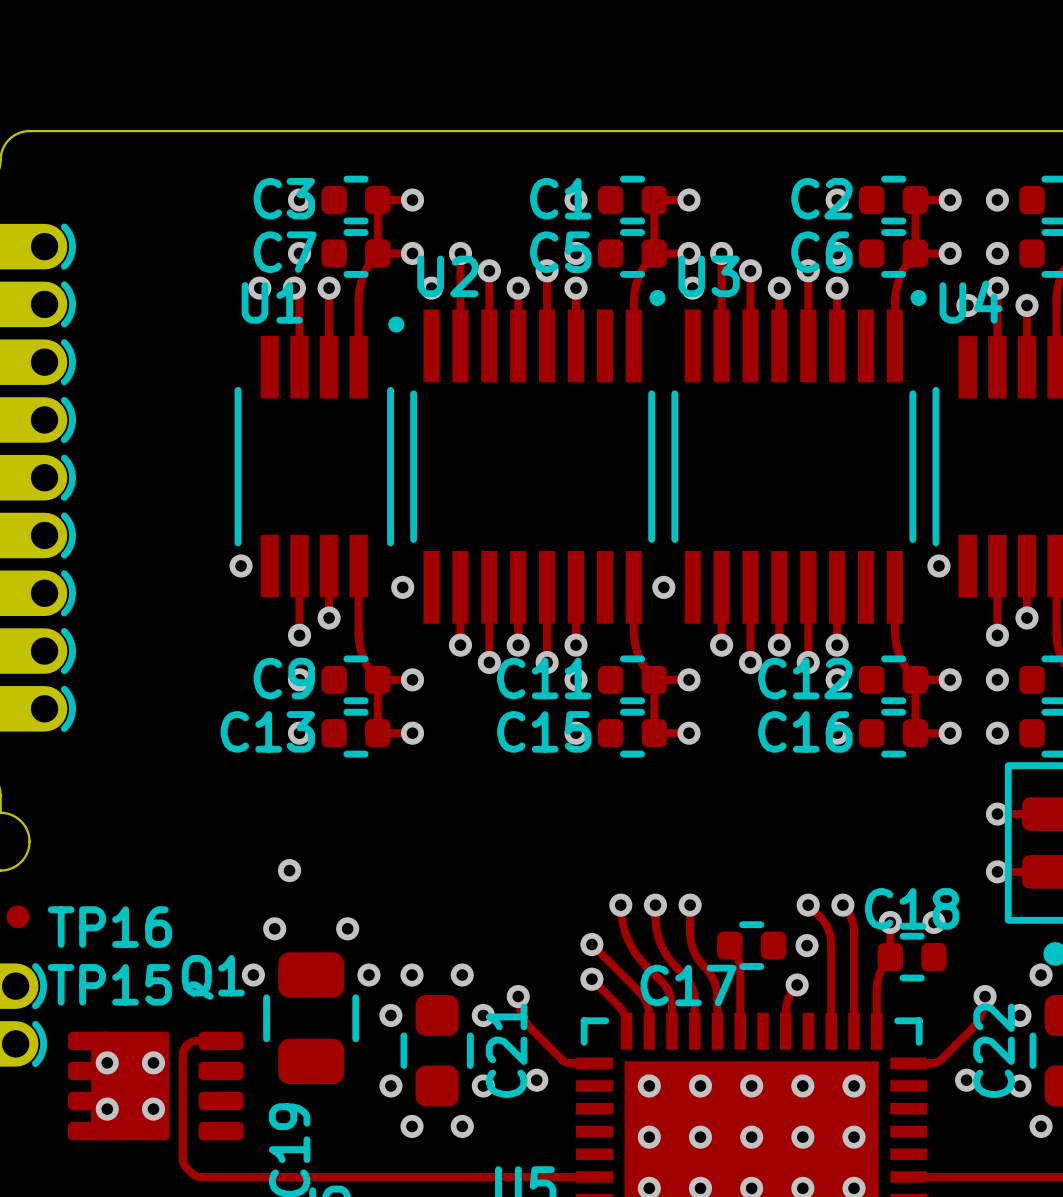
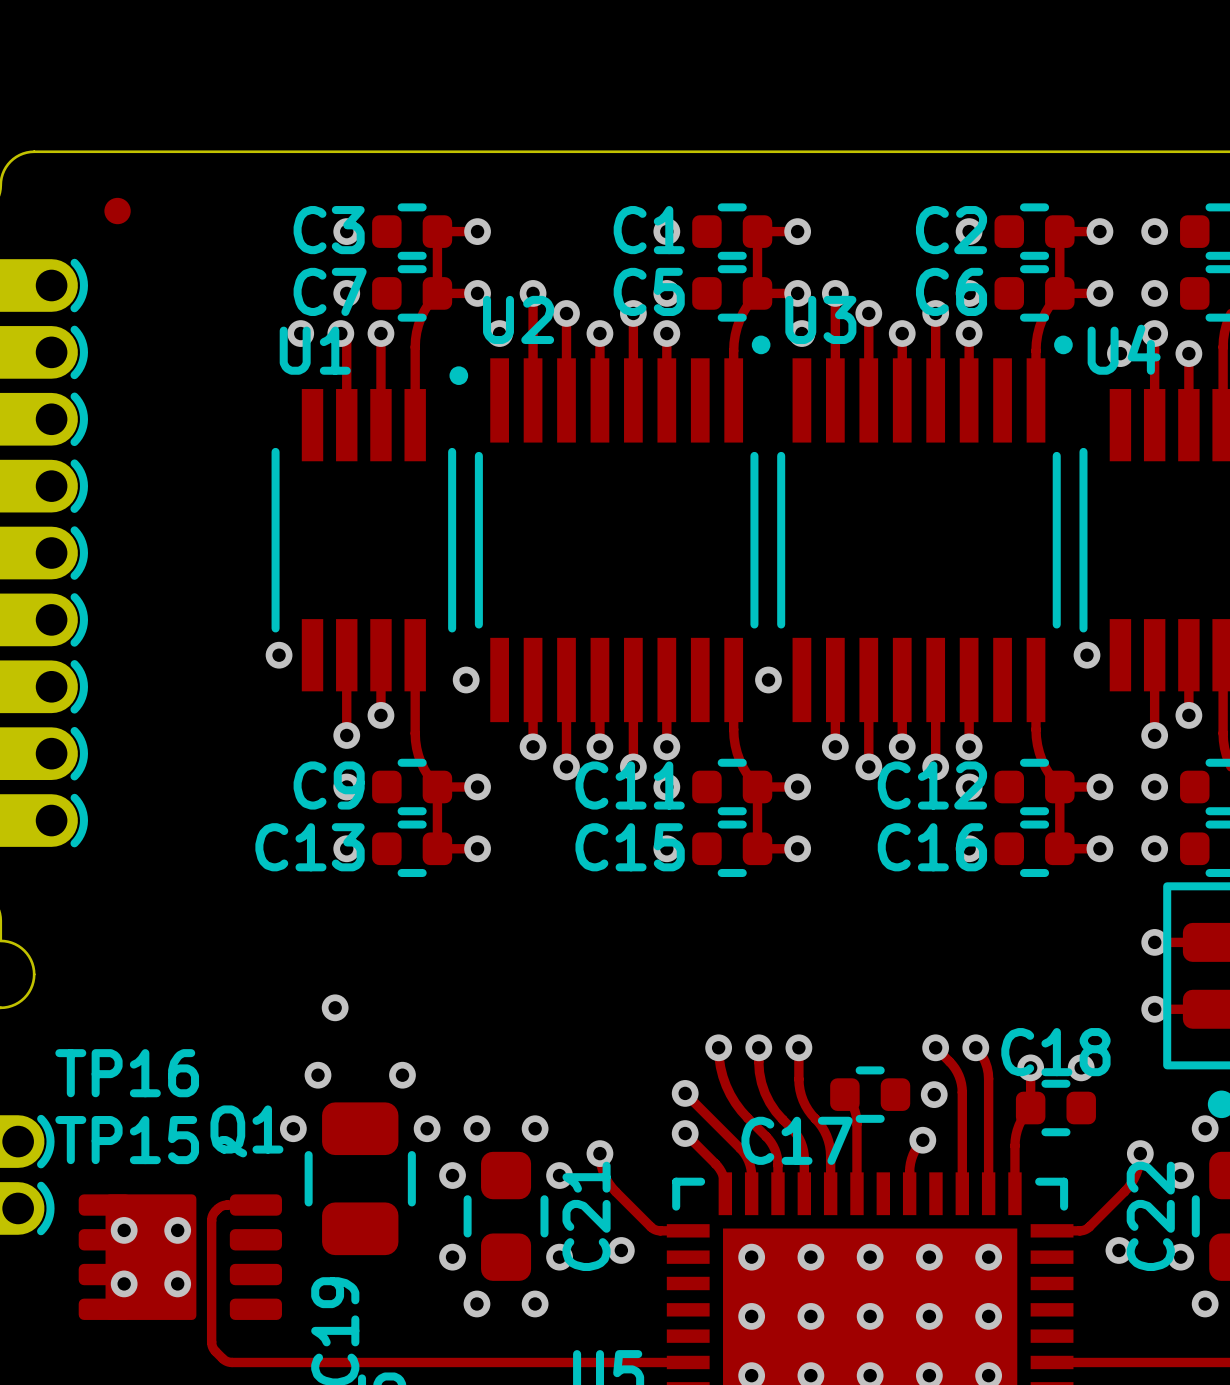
part position: (17, 916) -> (117, 211)

